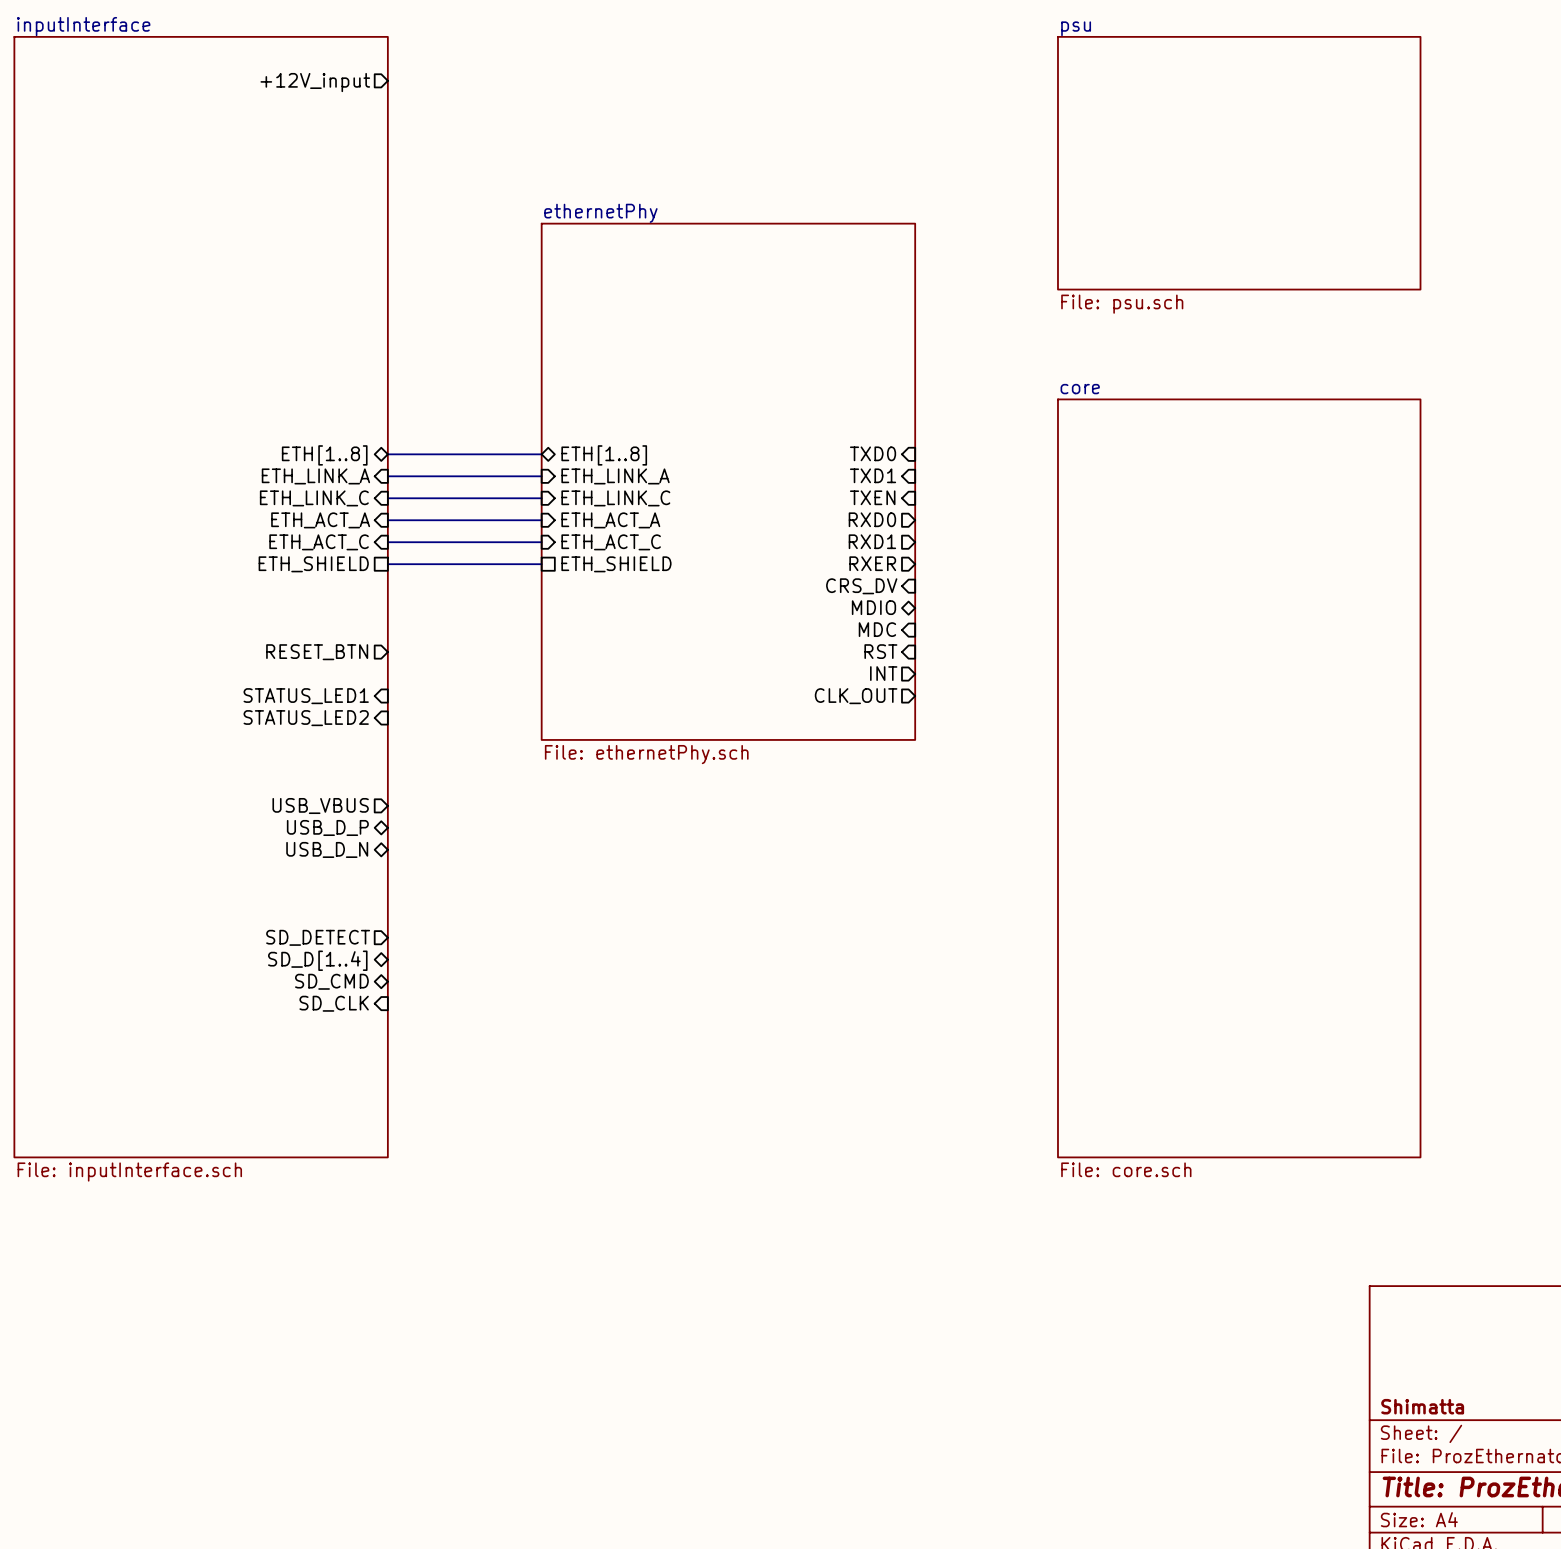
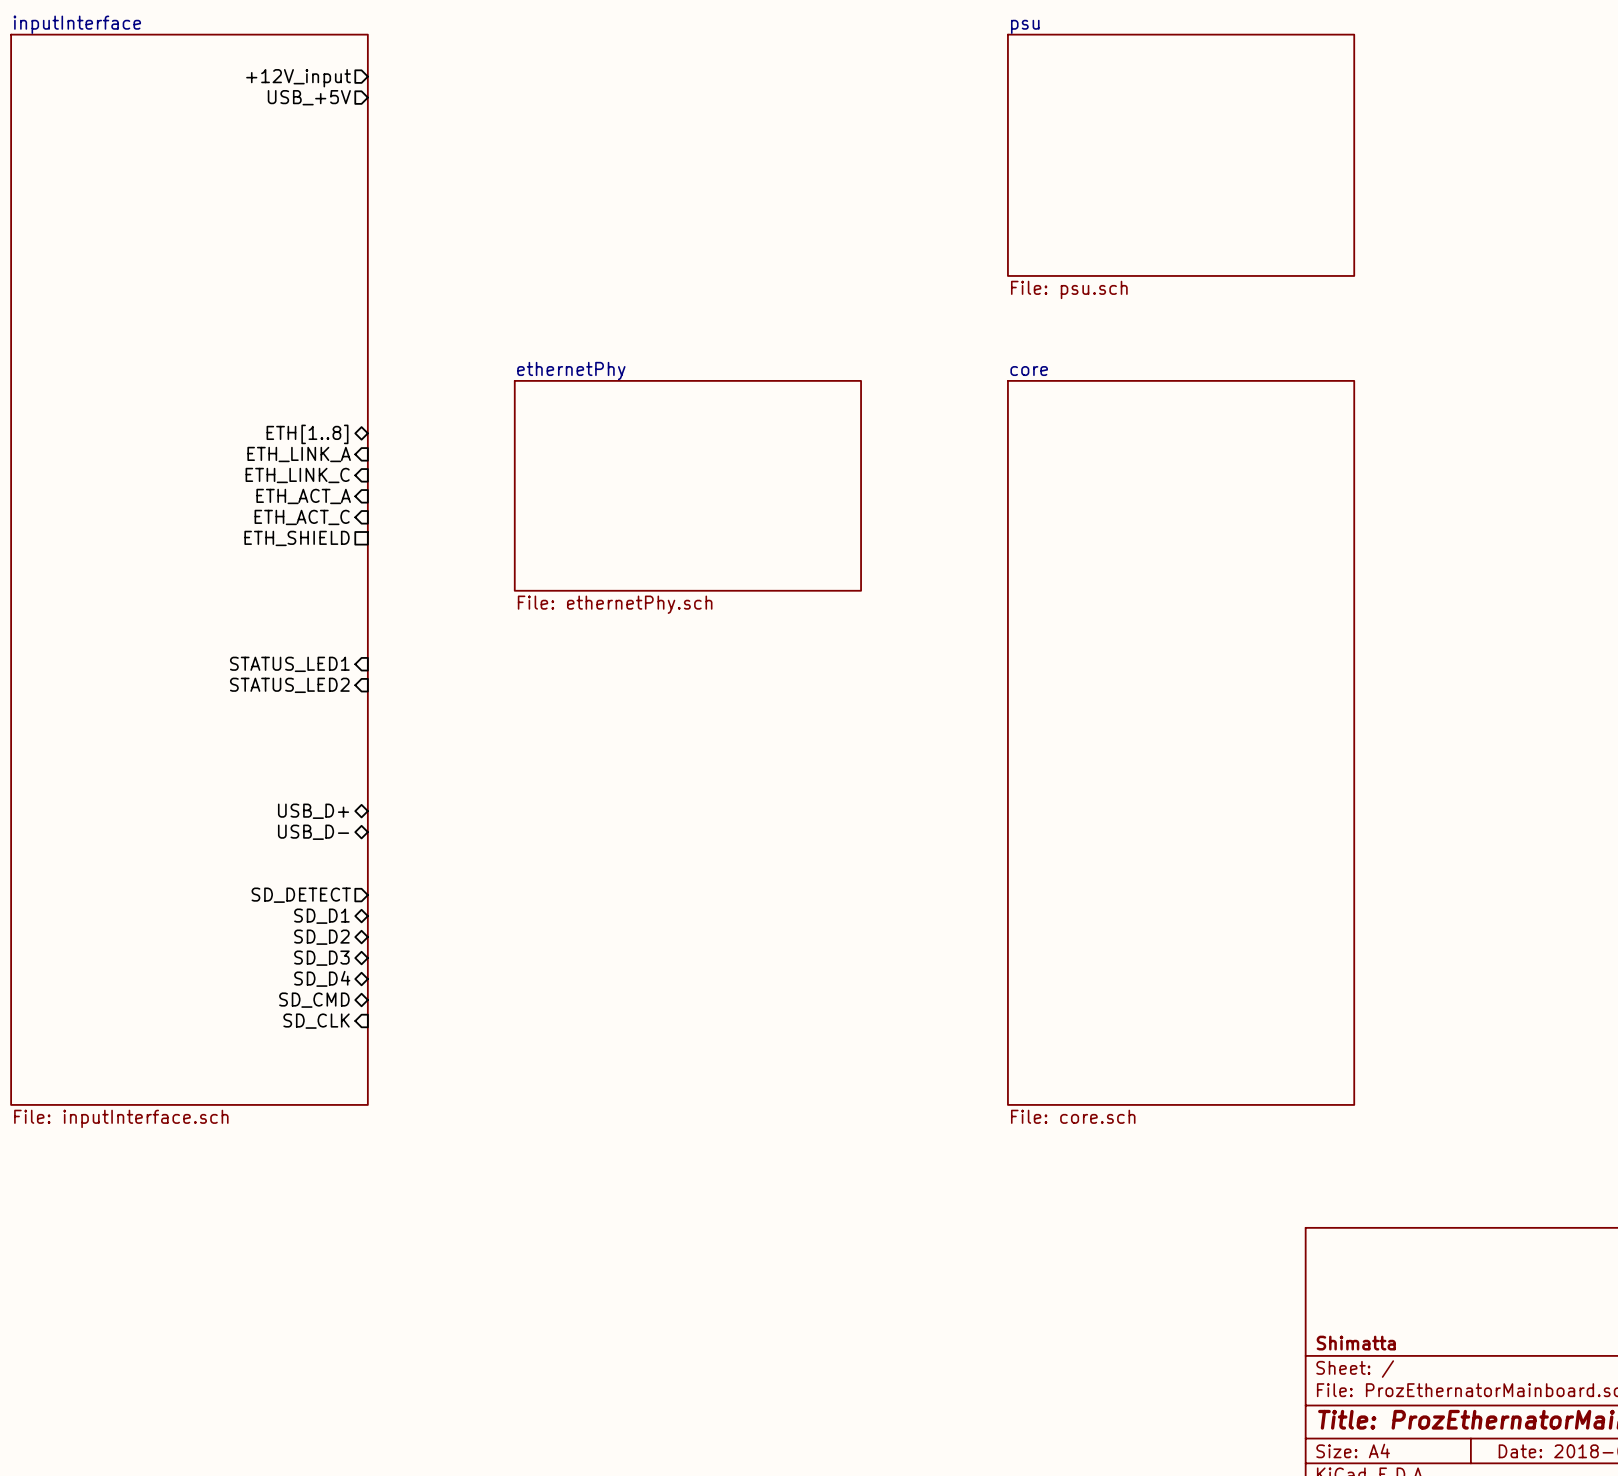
sheet pin: none -> USB_+5V (309, 97)
sheet pin: TXD0 (873, 453) -> none
wire: (387, 454) (541, 454) -> none
sheet pin: ETH[1..8] (604, 455) -> none
sheet pin: TXD1 (873, 475) -> none
wire: (387, 476) (541, 476) -> none
sheet pin: ETH_LINK_A (615, 476) -> none
sheet ethernetPhy: File: ethernetPhy.sch (728, 481) -> none
sheet pin: TXEN (872, 497) -> none
wire: (387, 498) (541, 498) -> none
sheet pin: ETH_LINK_C (615, 498) -> none
sheet ethernetPhy: none -> File: ethernetPhy.sch (687, 485)
sheet pin: RXD0 (872, 519) -> none
wire: (387, 520) (541, 520) -> none
sheet pin: ETH_ACT_A (610, 520) -> none
sheet pin: RXD1 (872, 541) -> none
wire: (387, 542) (541, 542) -> none
sheet pin: ETH_ACT_C (611, 542) -> none
sheet pin: RXER (872, 563) -> none
wire: (387, 564) (541, 564) -> none
sheet pin: ETH_SHIELD (616, 564) -> none
sheet pin: CRS_DV (861, 586) -> none
sheet pin: MDIO (873, 607) -> none
sheet pin: MDC (877, 629) -> none
sheet pin: RST (880, 651) -> none
sheet pin: RESET_BTN (317, 652) -> none
sheet pin: INT (883, 673) -> none
sheet pin: CLK_OUT (856, 696) -> none
sheet pin: USB_VBUS (320, 806) -> none
sheet pin: USB_D_P (327, 827) -> none
sheet pin: USB_D_N (327, 849) -> USB_D+ (313, 811)
sheet pin: none -> USB_D- (313, 832)
sheet pin: SD_D[1..4] (317, 960) -> SD_D1 (321, 916)
sheet pin: SD_CMD (331, 981) -> SD_D2 (321, 937)
sheet pin shape: input (334, 1003) -> bidirectional (321, 958)
sheet pin: SD_CLK (334, 1003) -> SD_D3 (321, 958)
sheet pin: none -> SD_D4 (322, 978)
sheet pin: none -> SD_CMD (314, 1000)
sheet pin: none -> SD_CLK (316, 1021)

